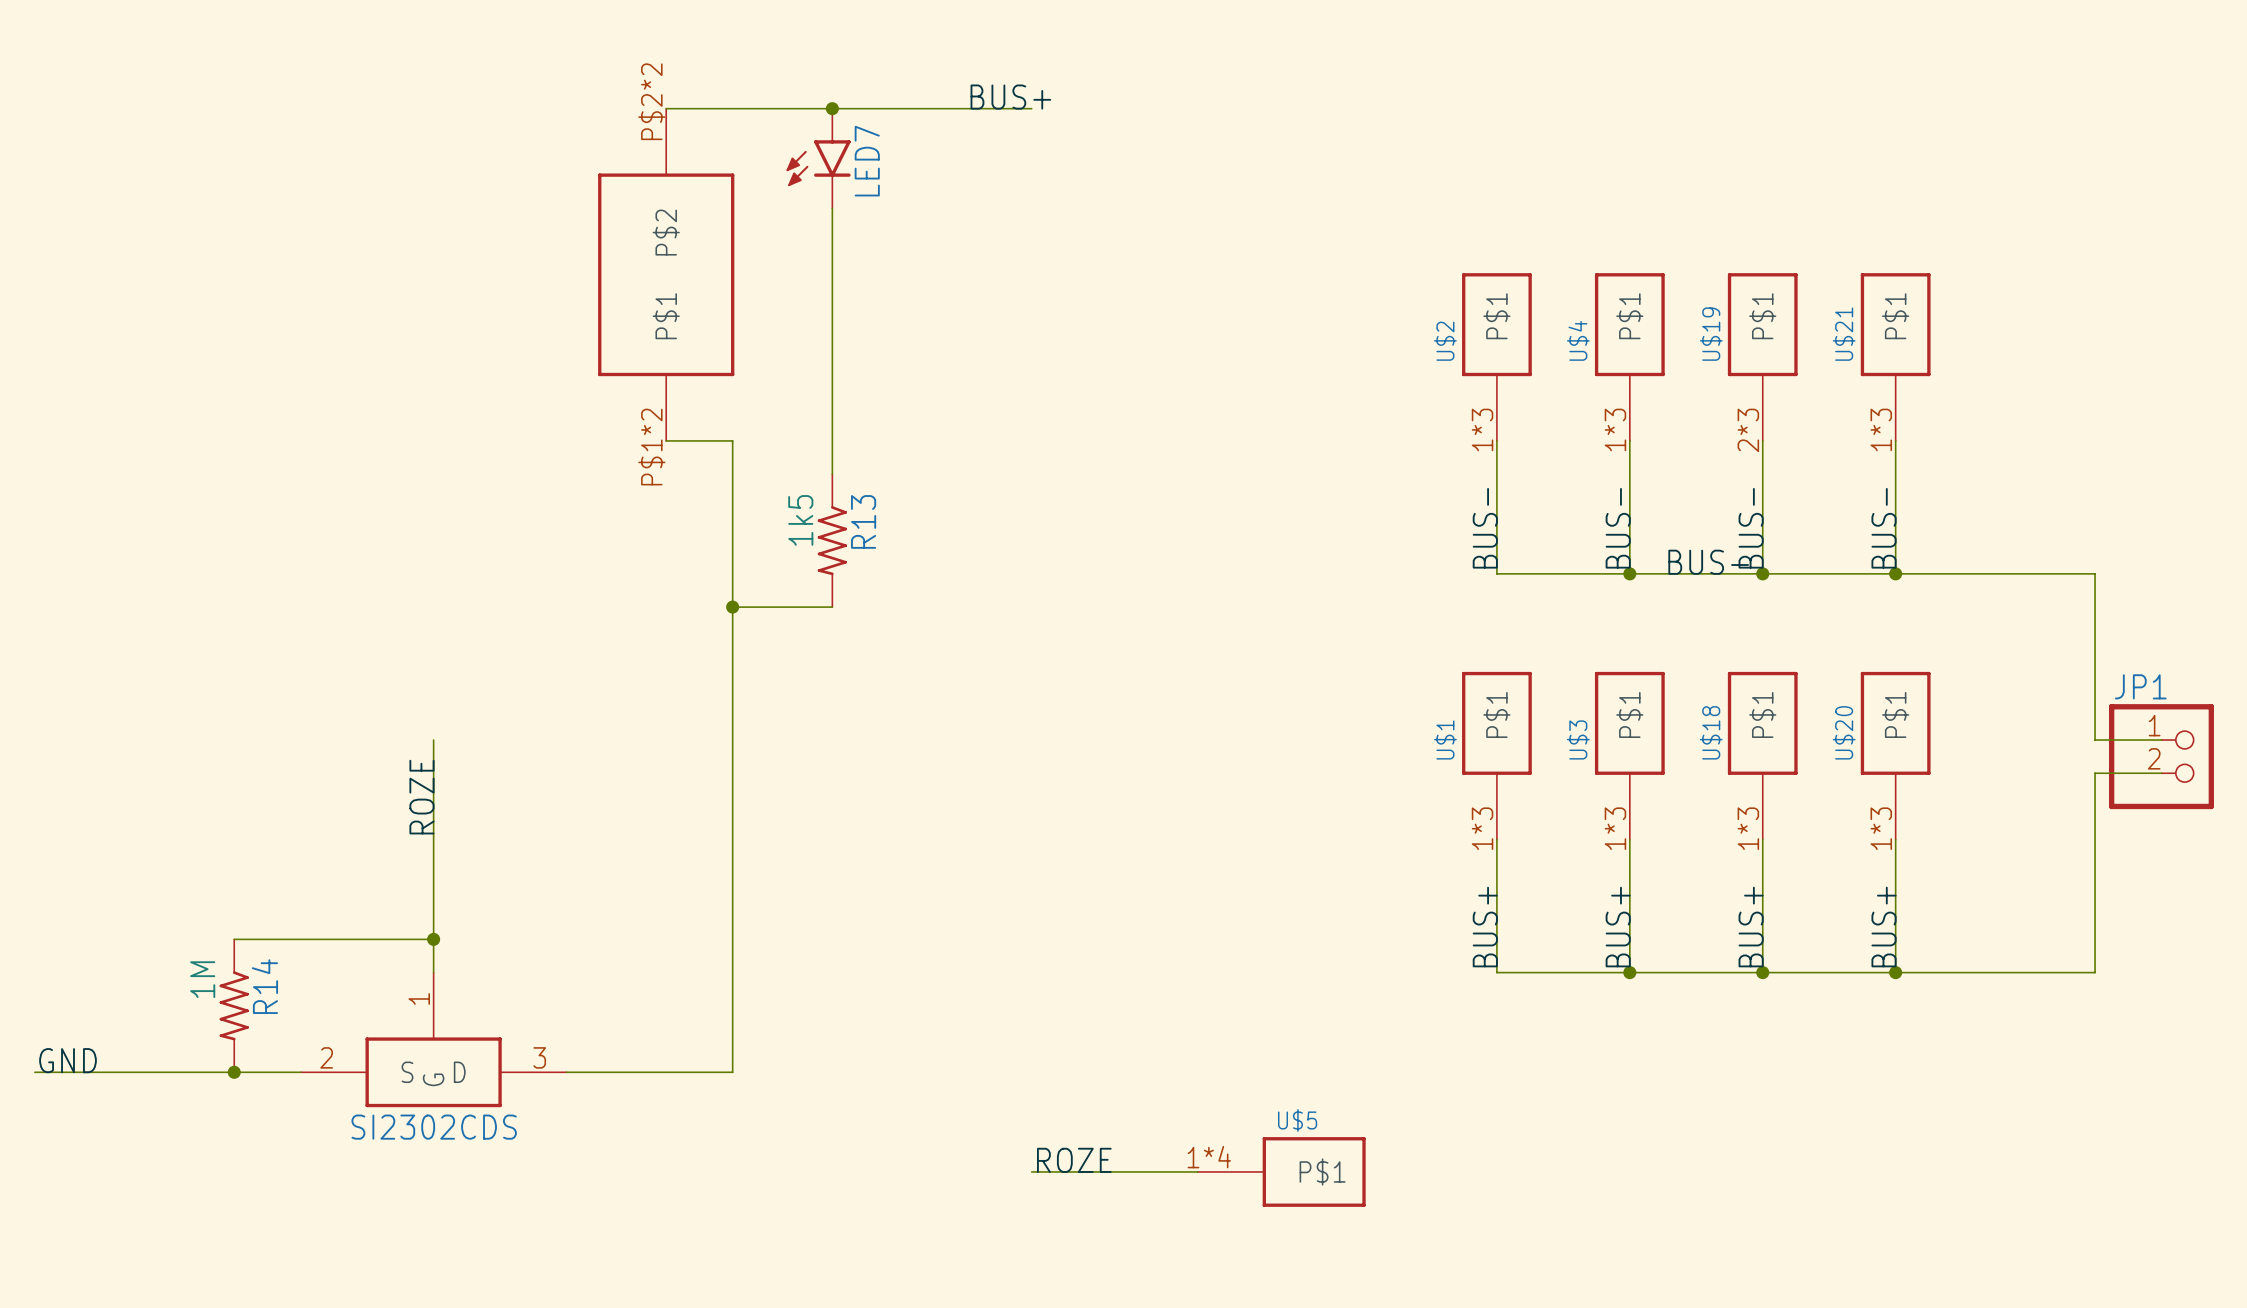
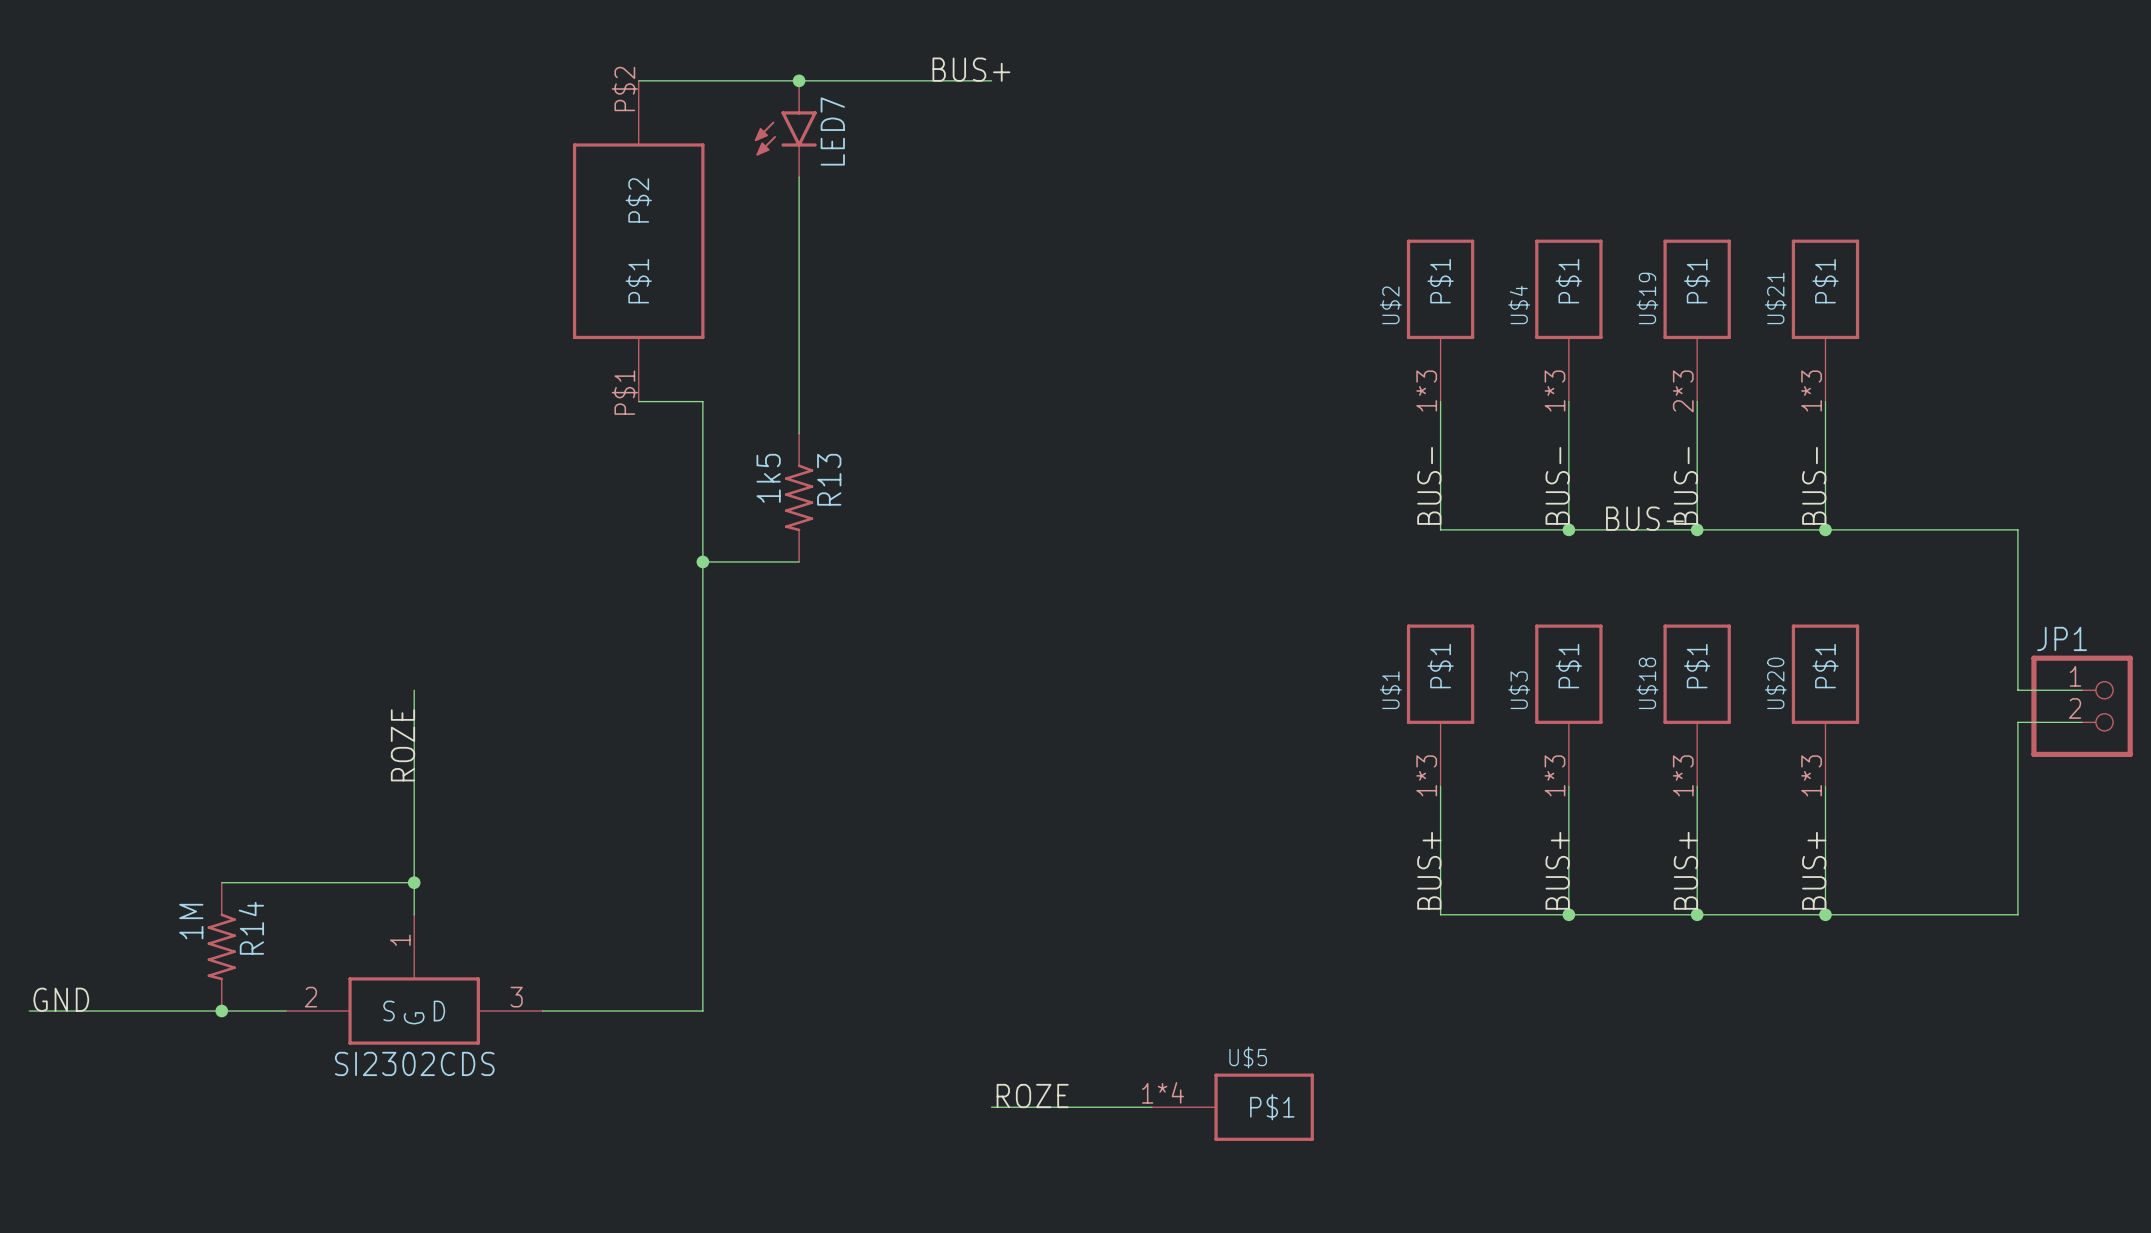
part pin number: P$2*2 (651, 101) -> P$2 (624, 88)
part pin number: P$1*2 (651, 447) -> P$1 (624, 392)

